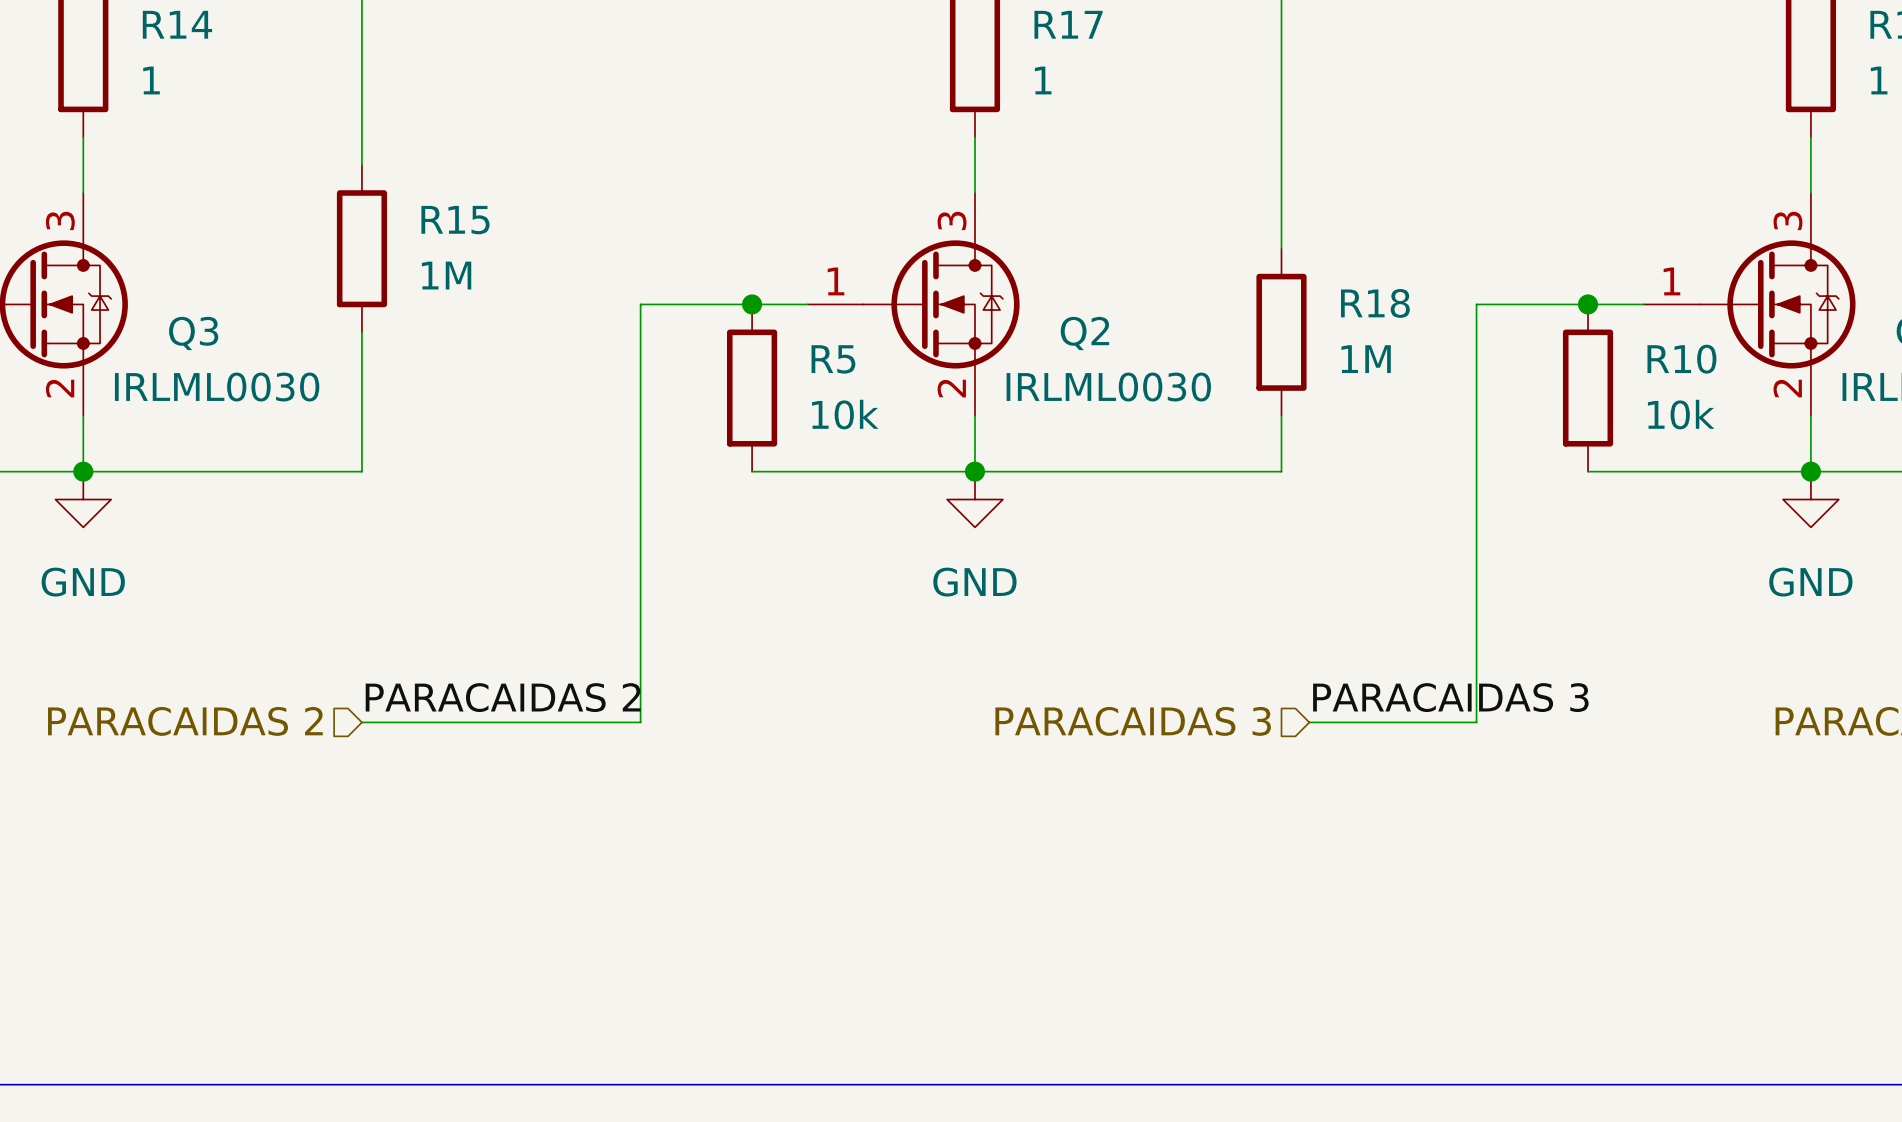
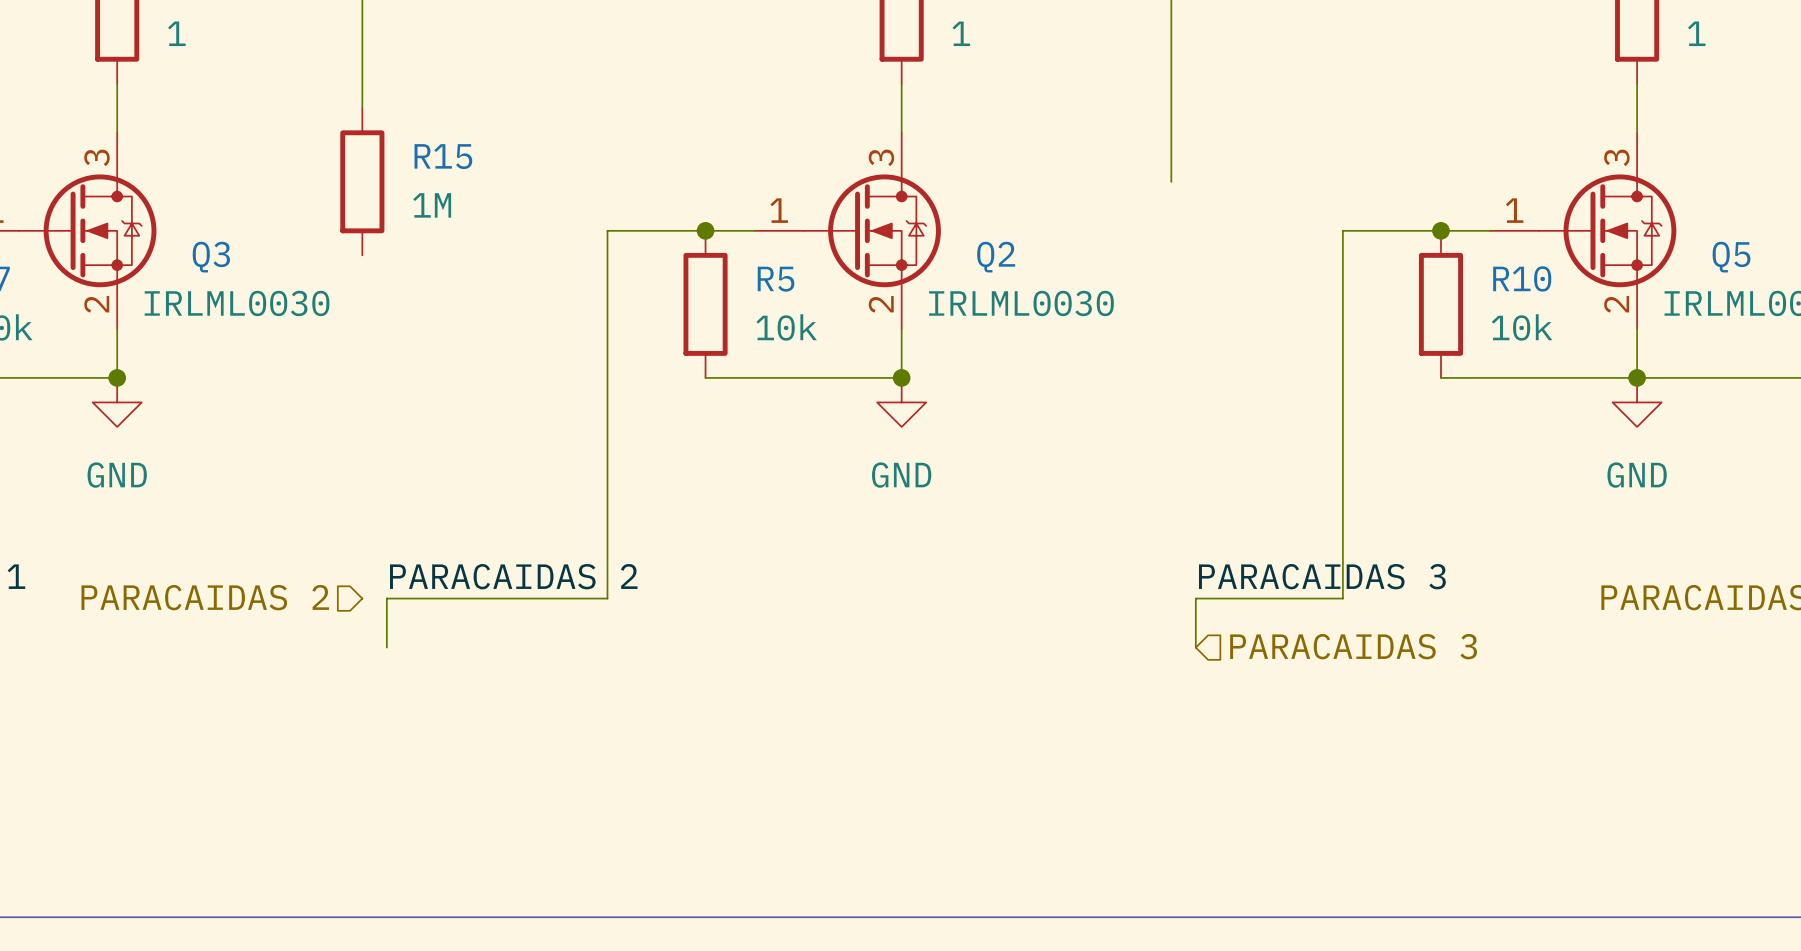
wire: (361, 332) (361, 471) (83, 471) -> none
R18: 1M (1281, 332) -> none
wire: (1281, 415) (1281, 471) (974, 471) -> none
label position: PARACAIDAS 2 (503, 697) -> PARACAIDAS 2 (513, 576)
hierarchical label rotation: 0° (1133, 721) -> 180° (1353, 646)
hierarchical label position: PARACAIDAS 3 (1133, 721) -> PARACAIDAS 3 (1353, 646)
wire: (361, 722) (389, 722) -> (386, 647) (386, 598)
wire: none -> (1195, 598) (1195, 647)

